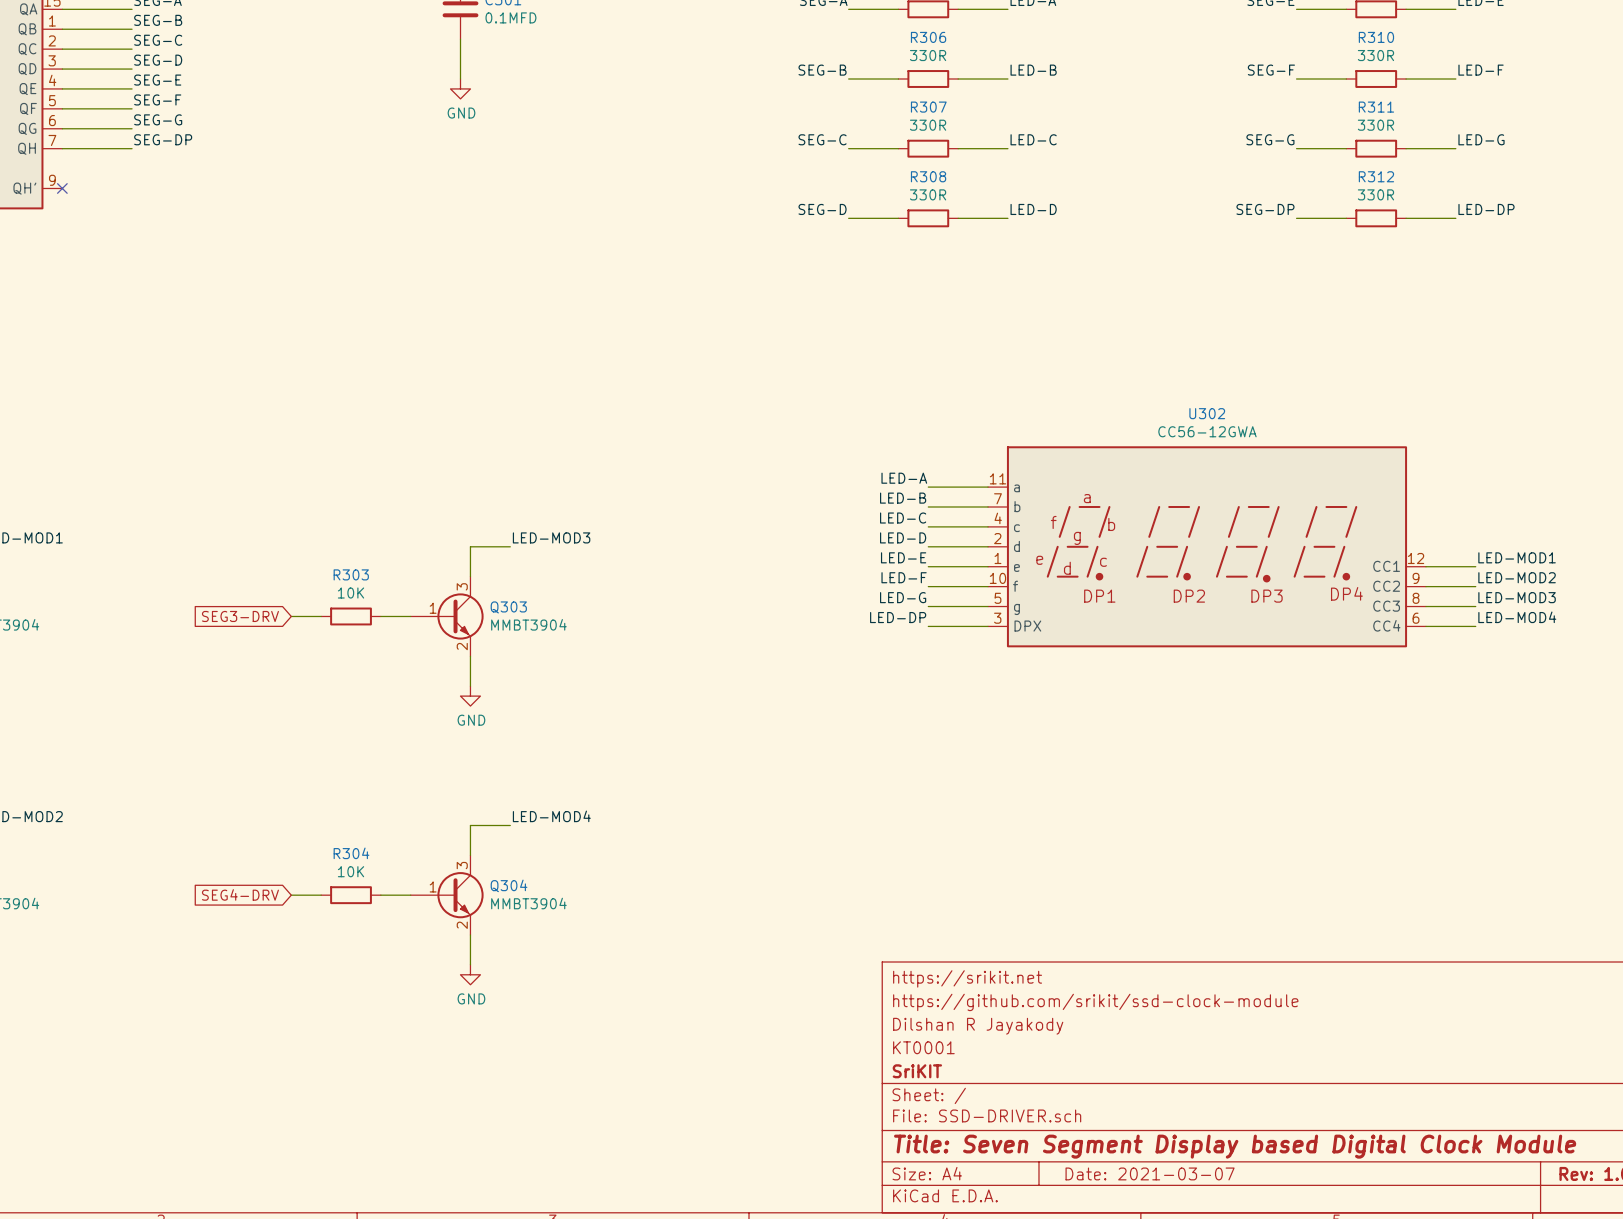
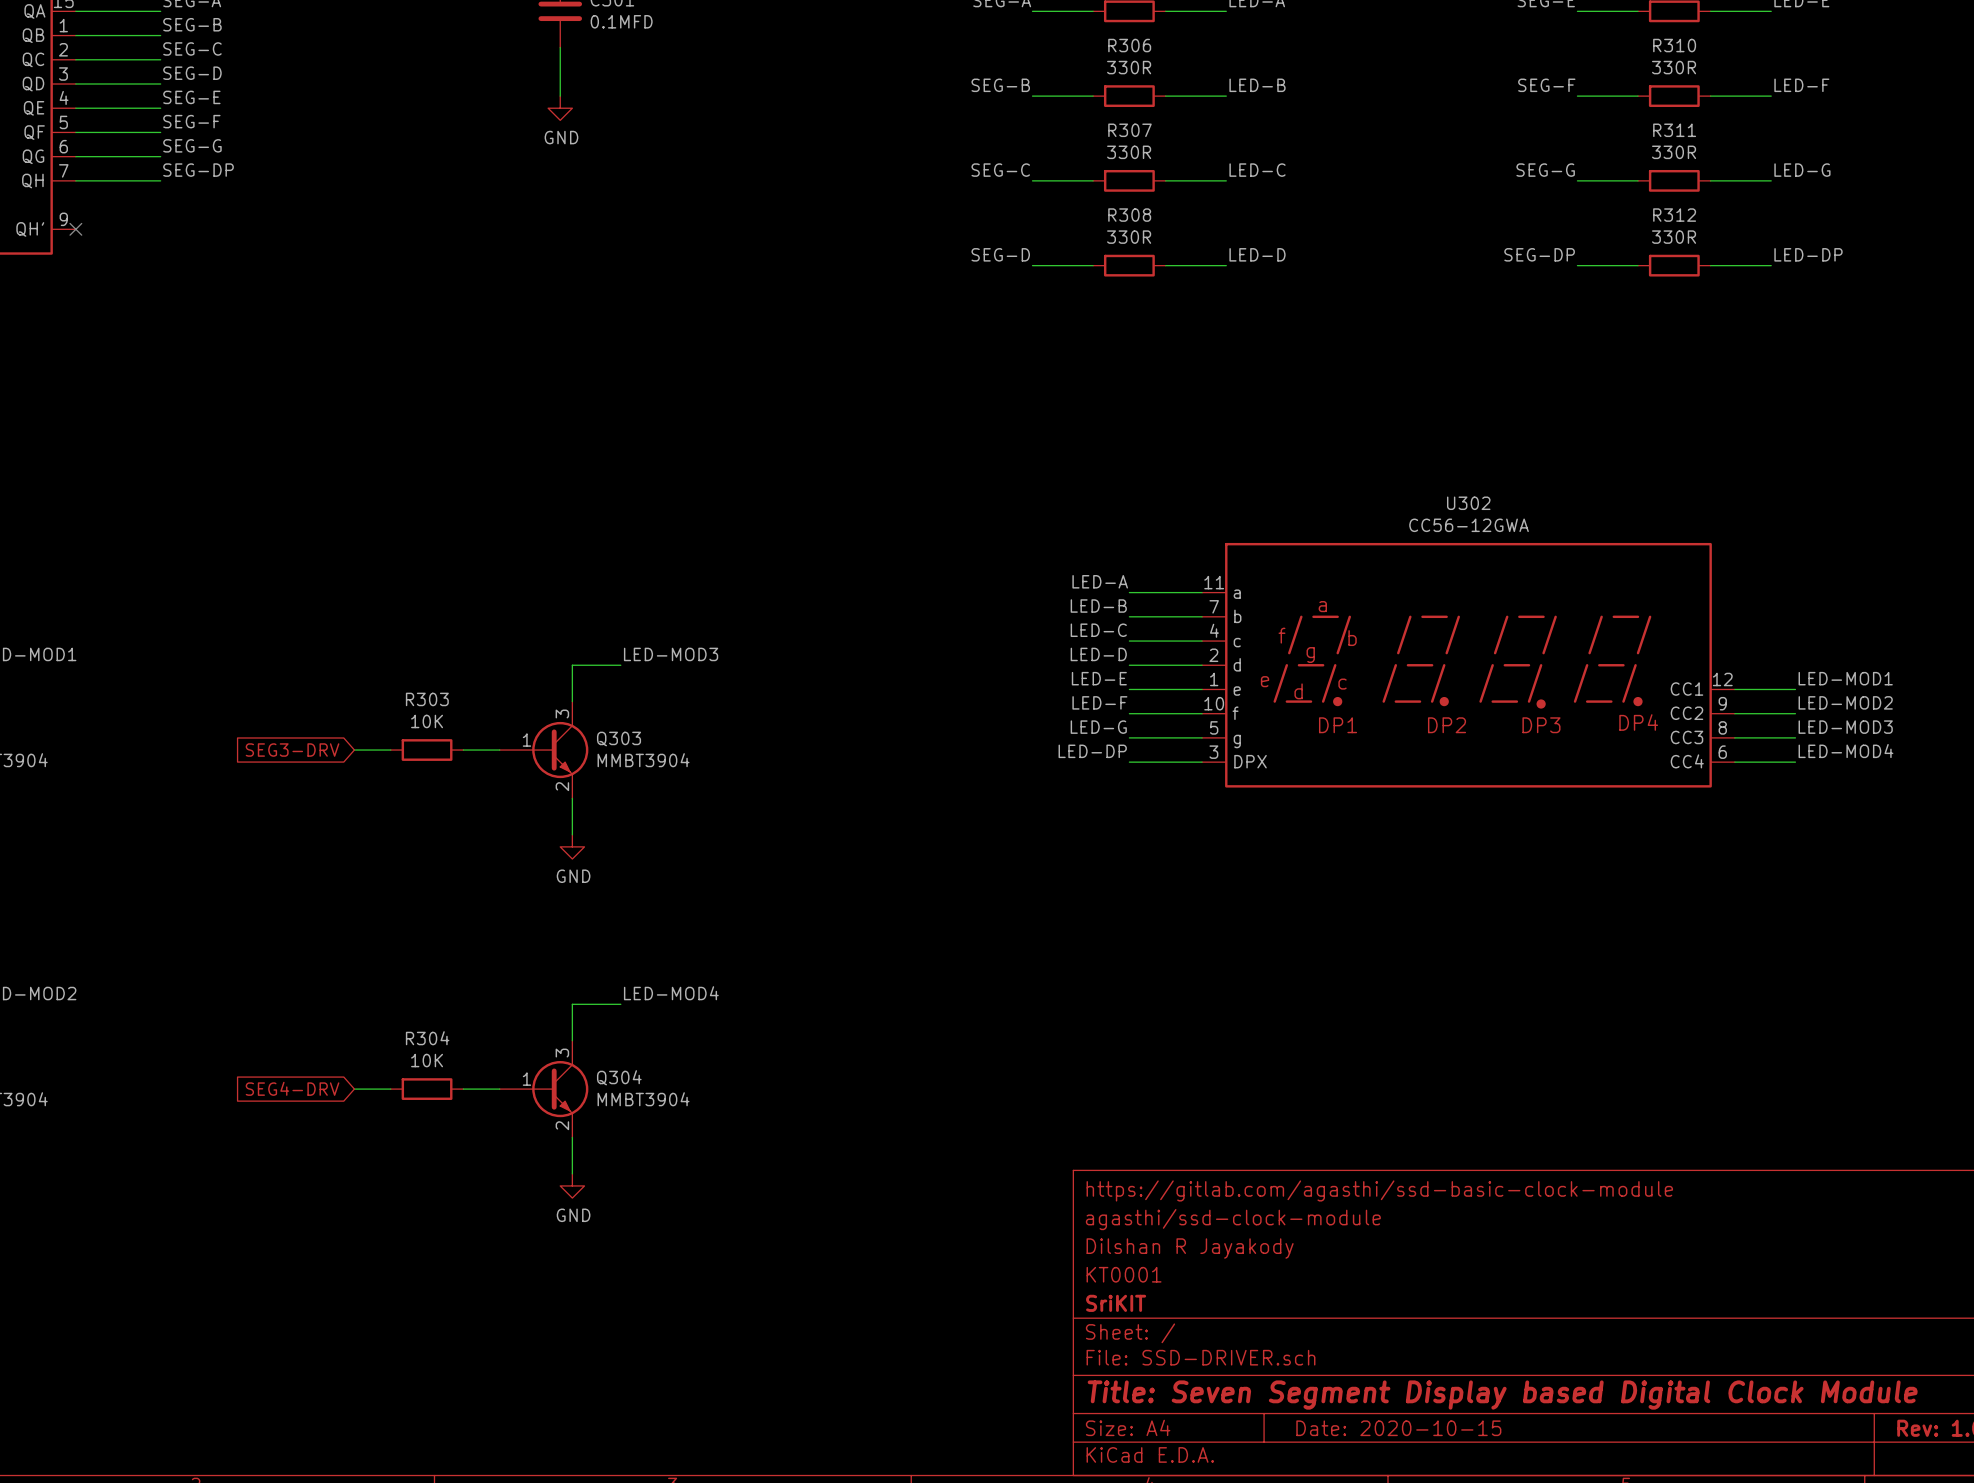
title block: https://srikit.net (967, 978) -> https://gitlab.com/agasthi/ssd-basic-clock-module (1379, 1190)
title block: https://github.com/srikit/ssd-clock-module (1095, 1002) -> agasthi/ssd-clock-module (1233, 1219)
title block: Date: 2021-03-07 (1150, 1173) -> Date: 2020-10-15 (1398, 1428)

